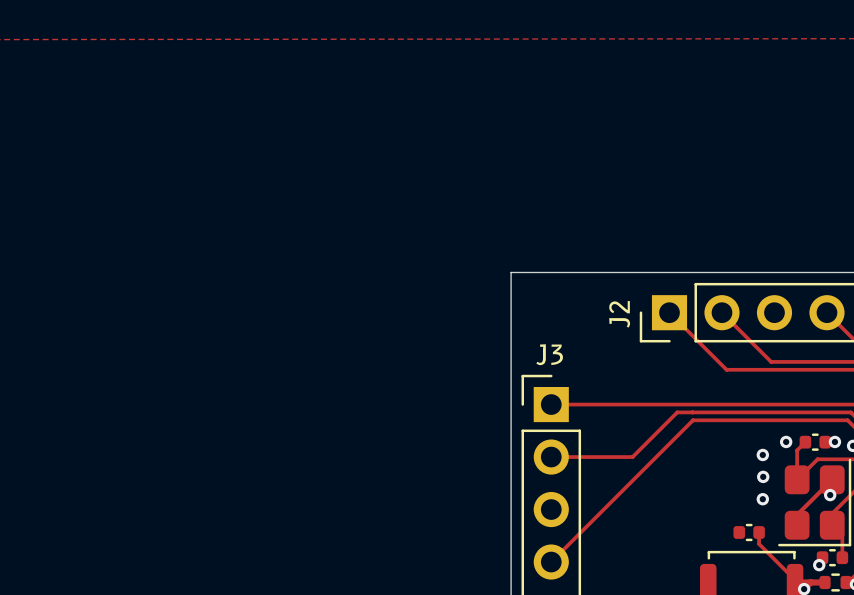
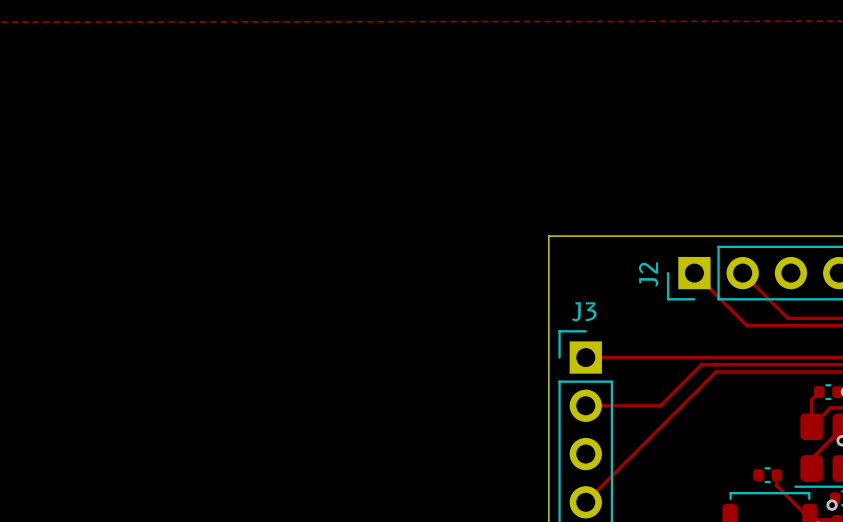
via: (786, 441) -> none
via: (762, 454) -> none
via: (763, 476) -> none
via: (762, 499) -> none

